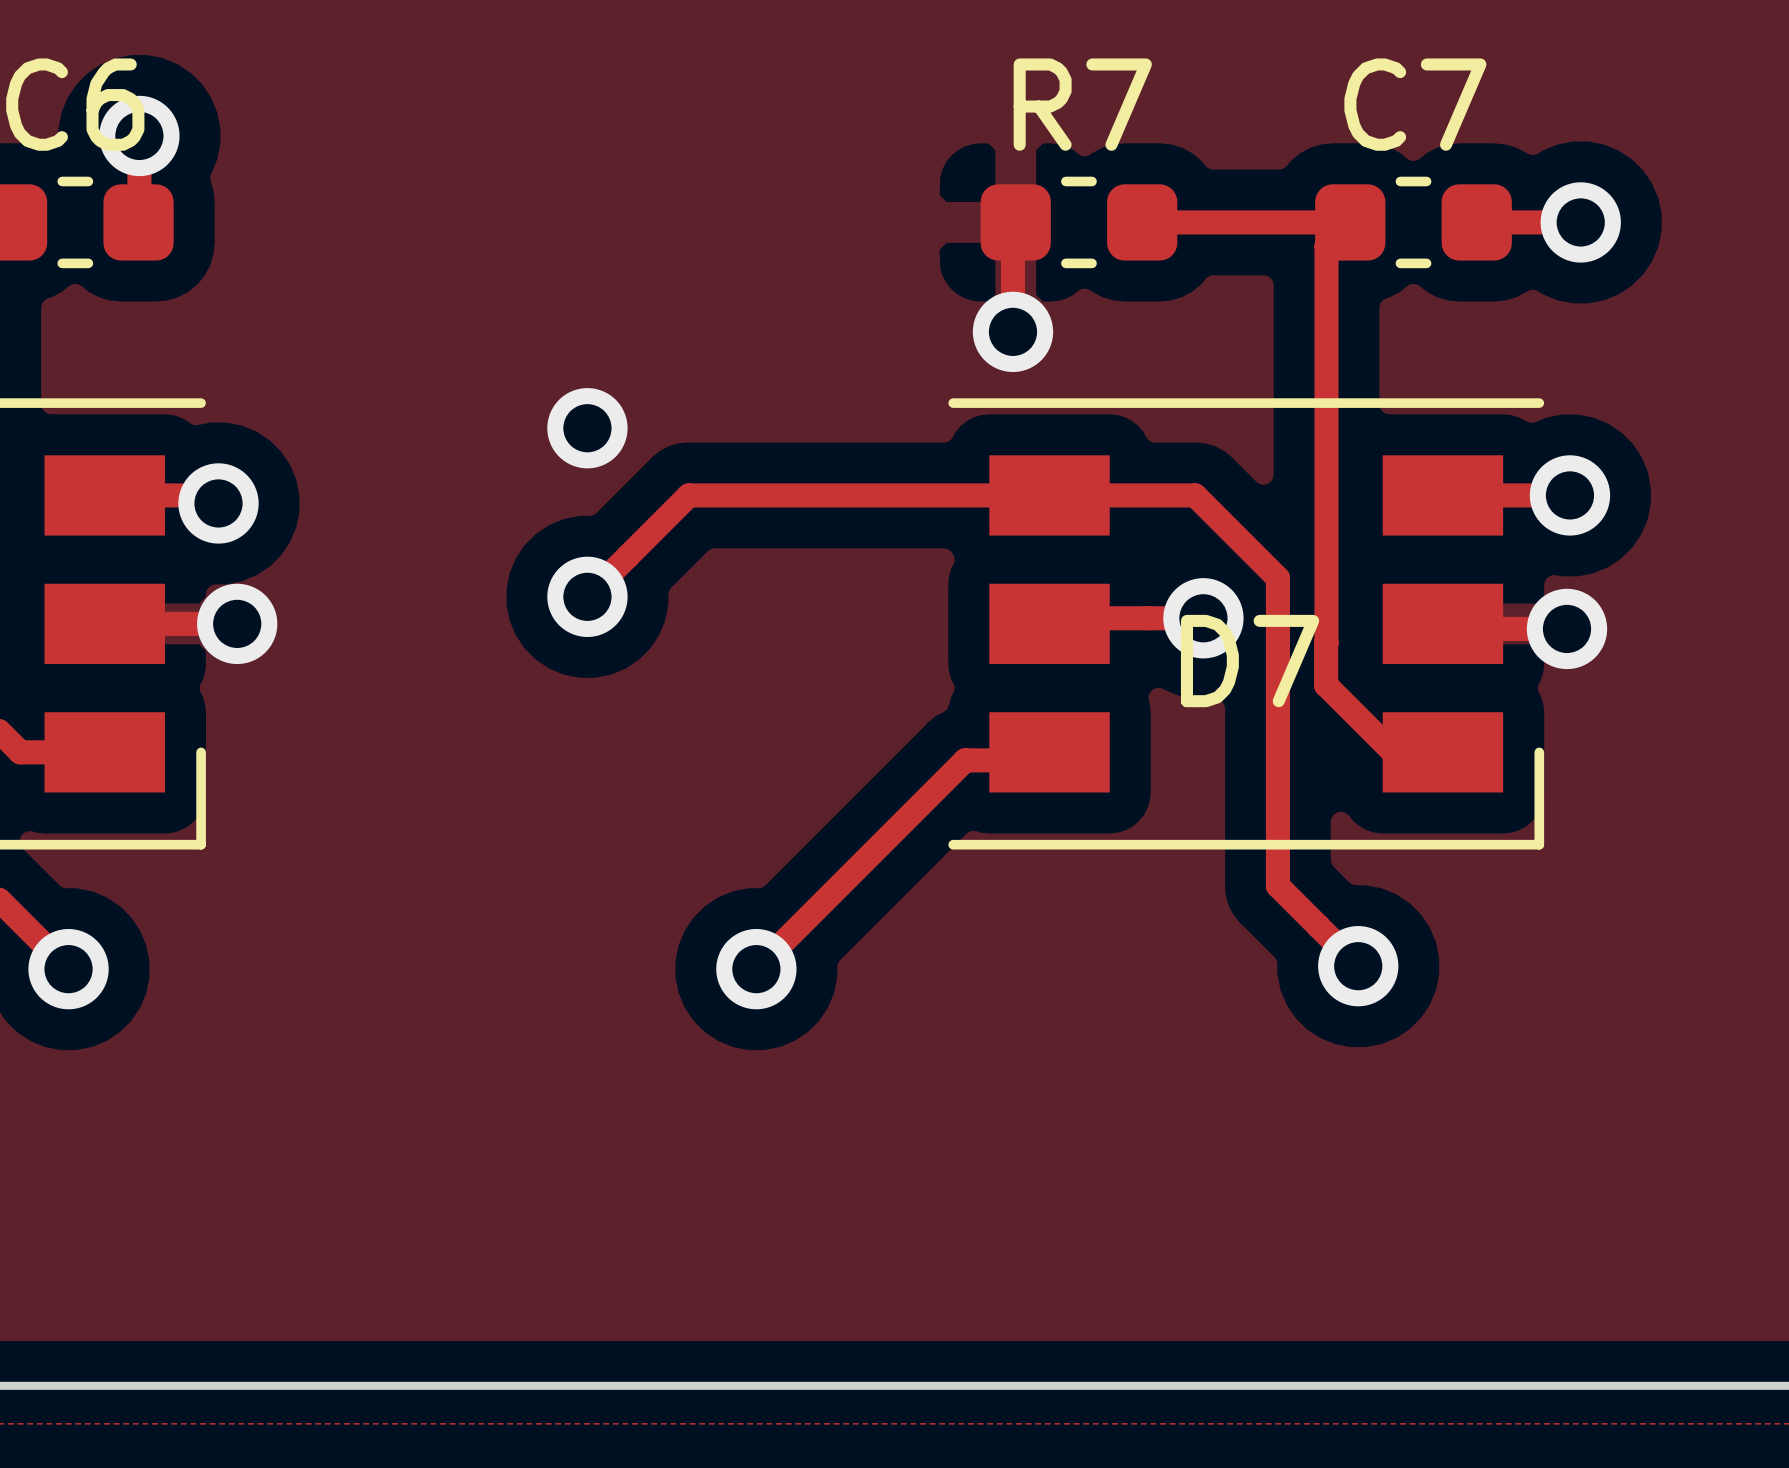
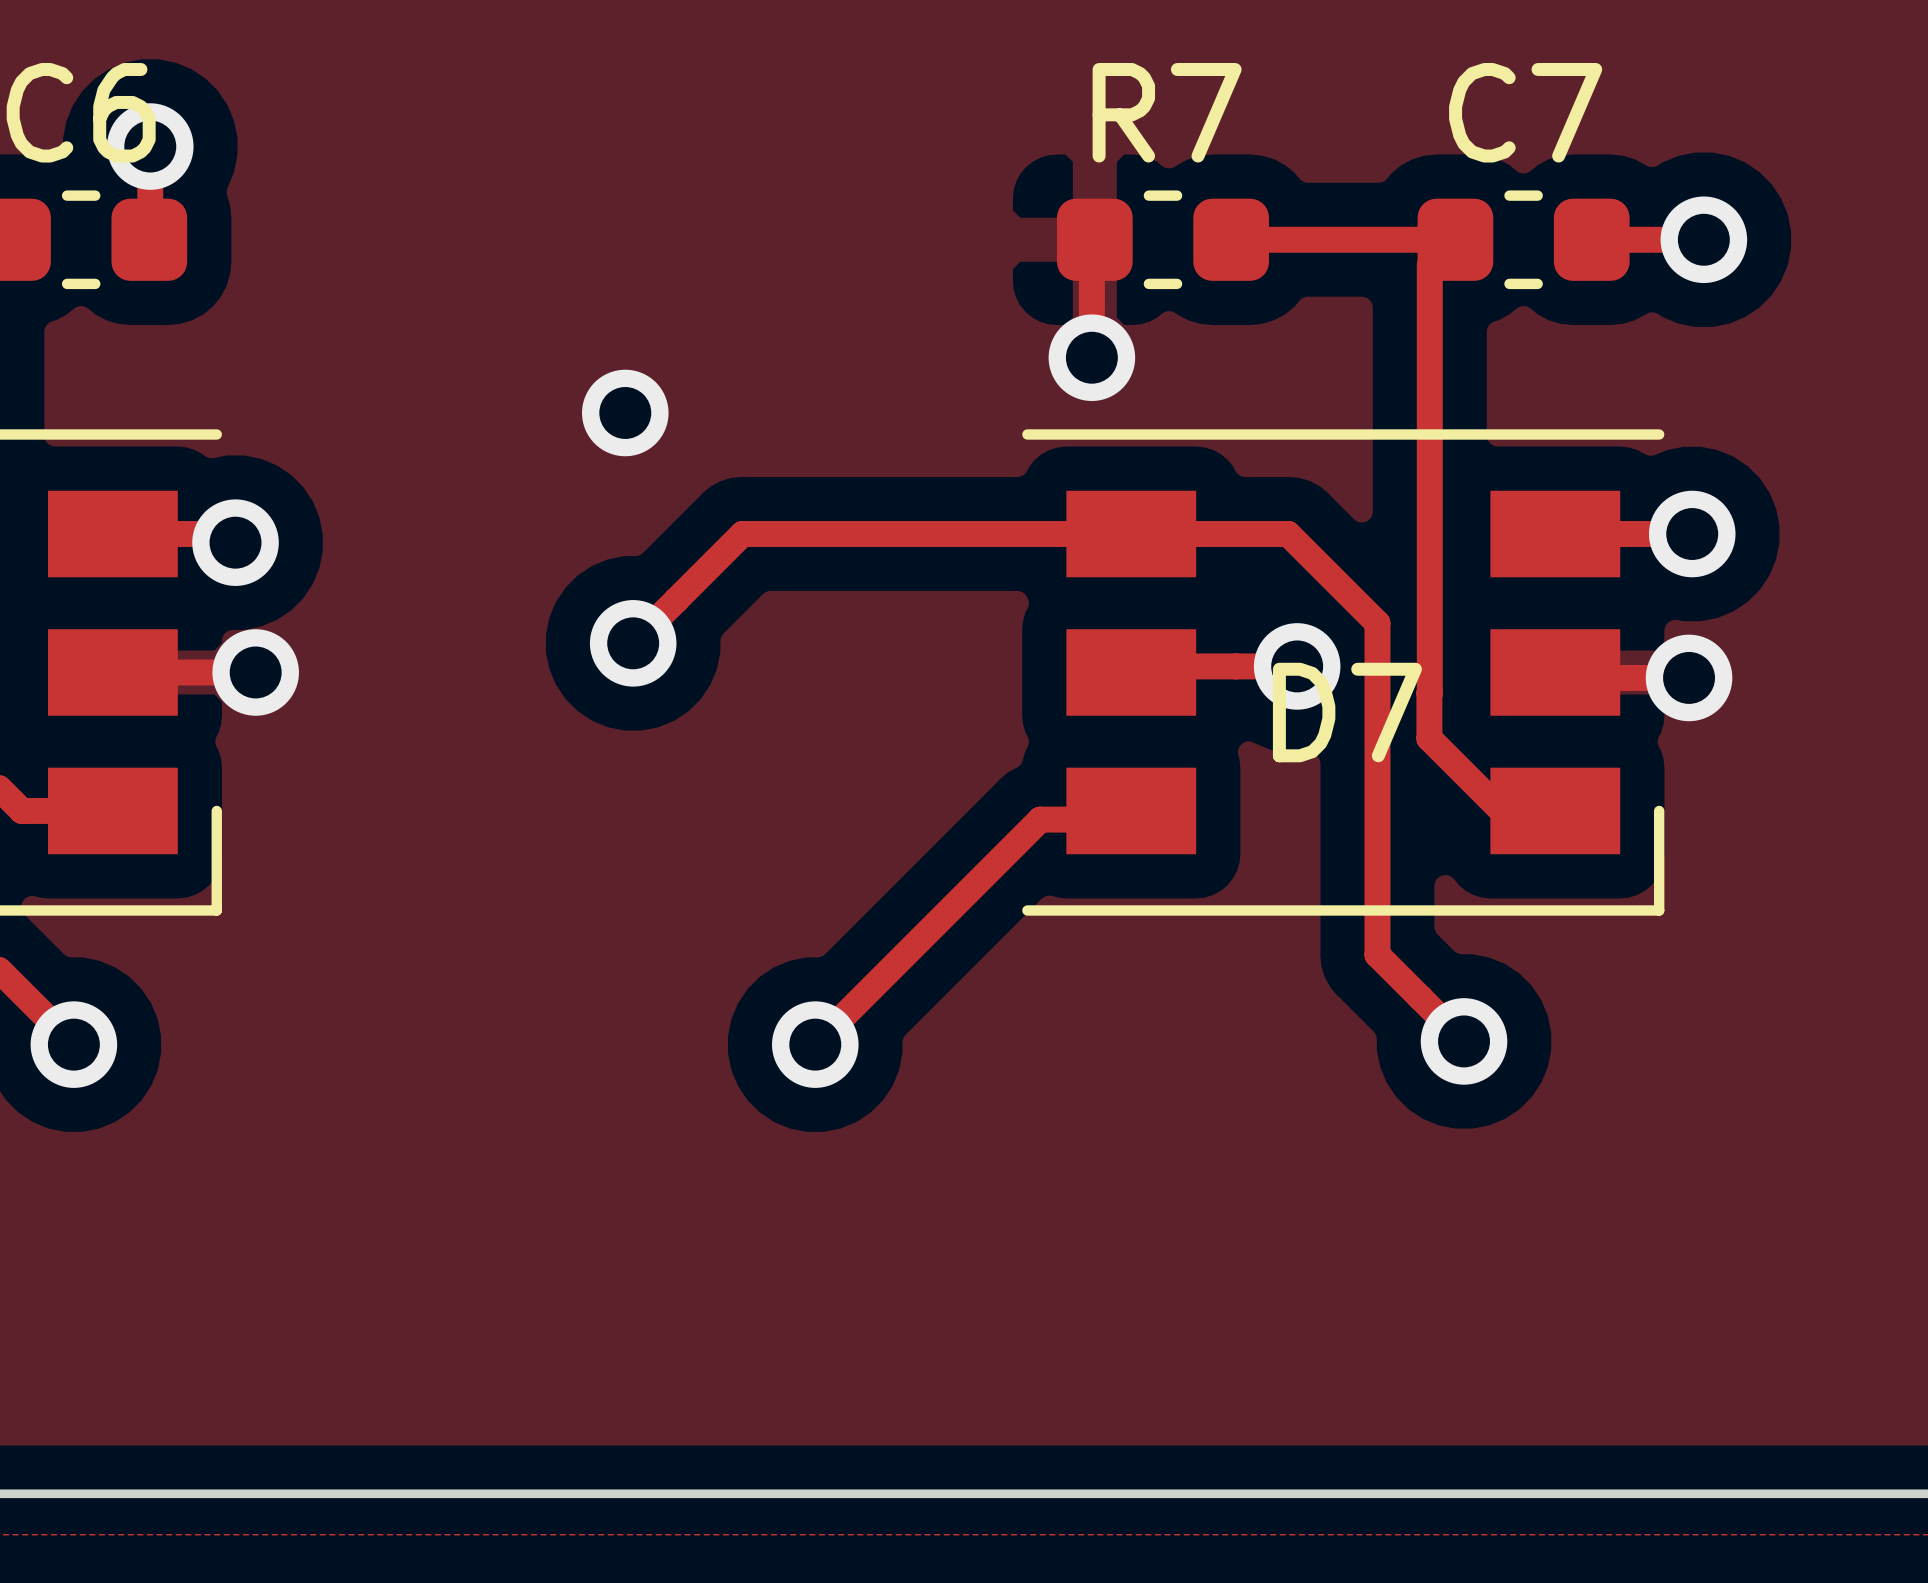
via position: (587, 428) -> (625, 412)

